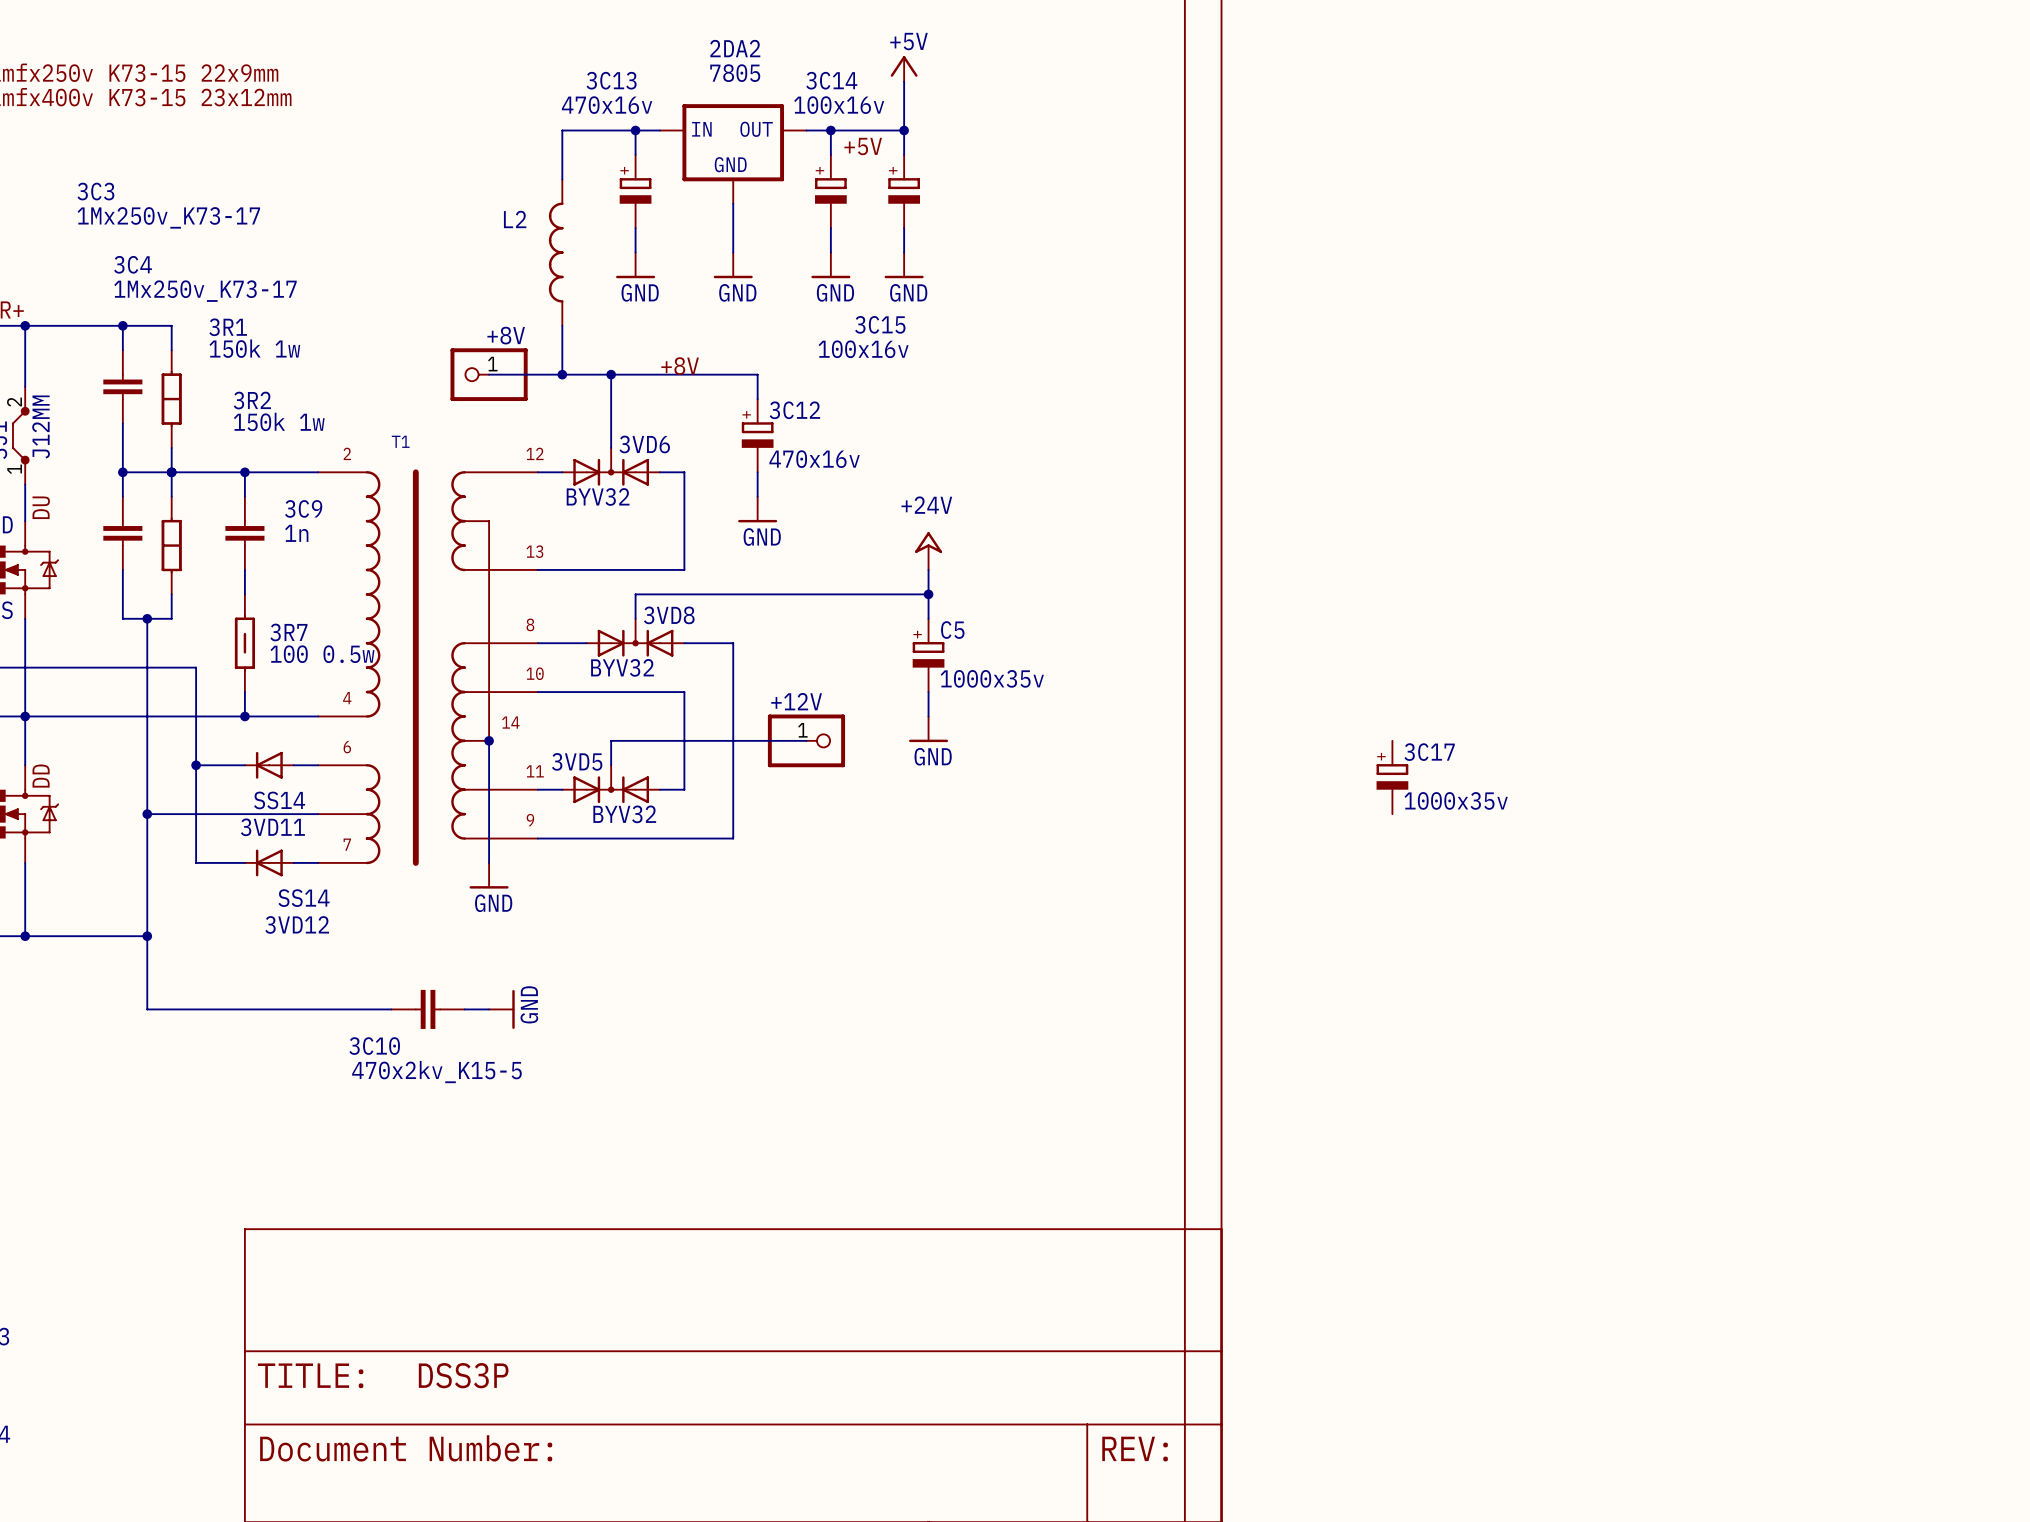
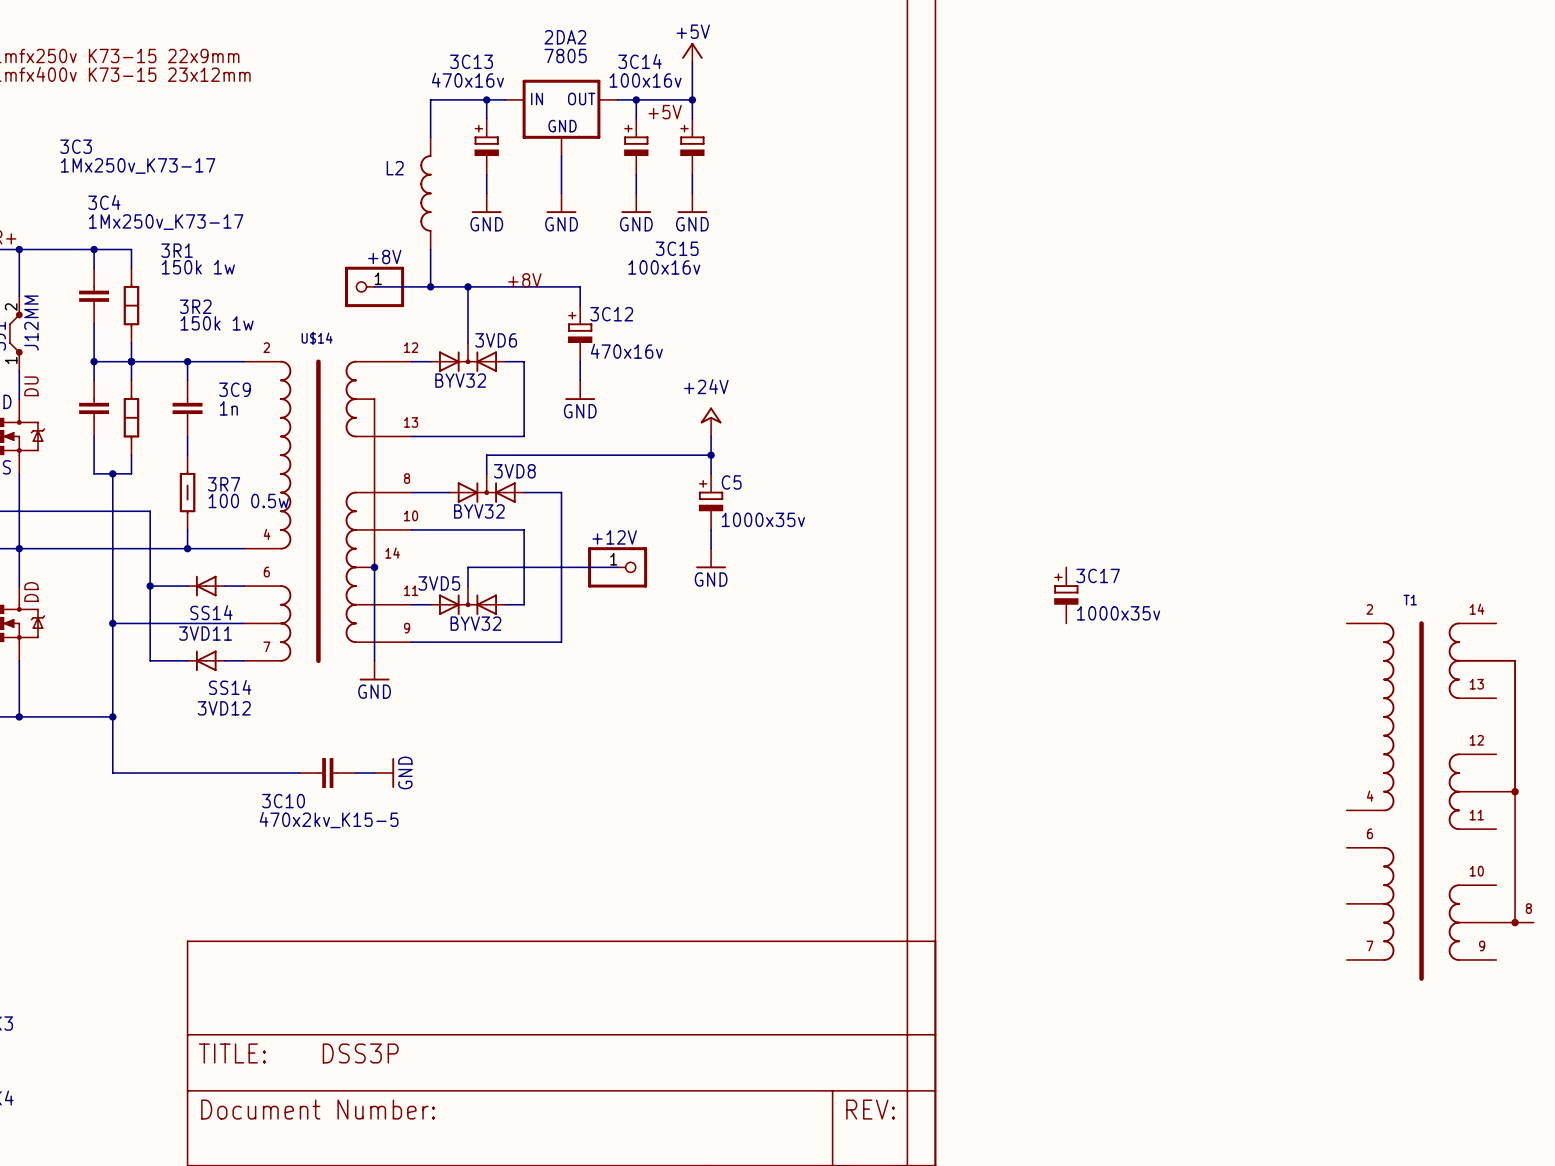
T1 name: T1 (400, 441) -> U$14 (317, 338)
T1: none -> (1440, 801)

